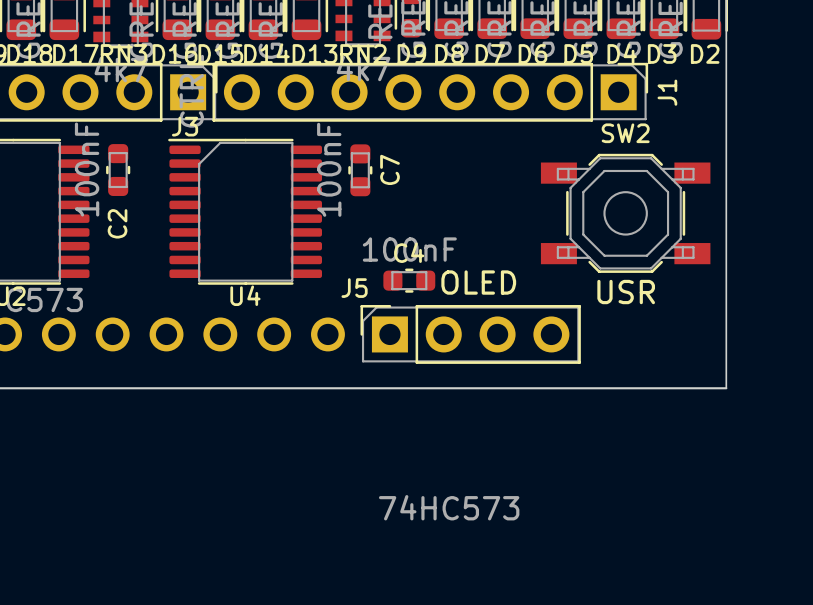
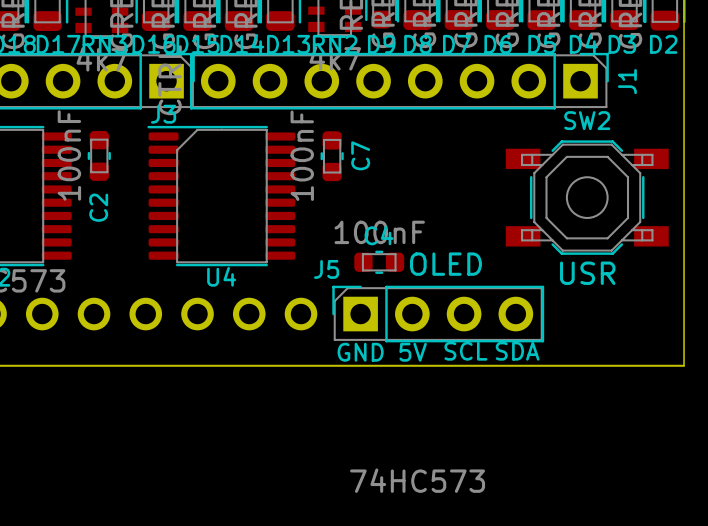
text: none -> SCL (465, 351)
text: none -> SDA (517, 351)
text: none -> GND (360, 352)
text: none -> 5V (413, 352)

